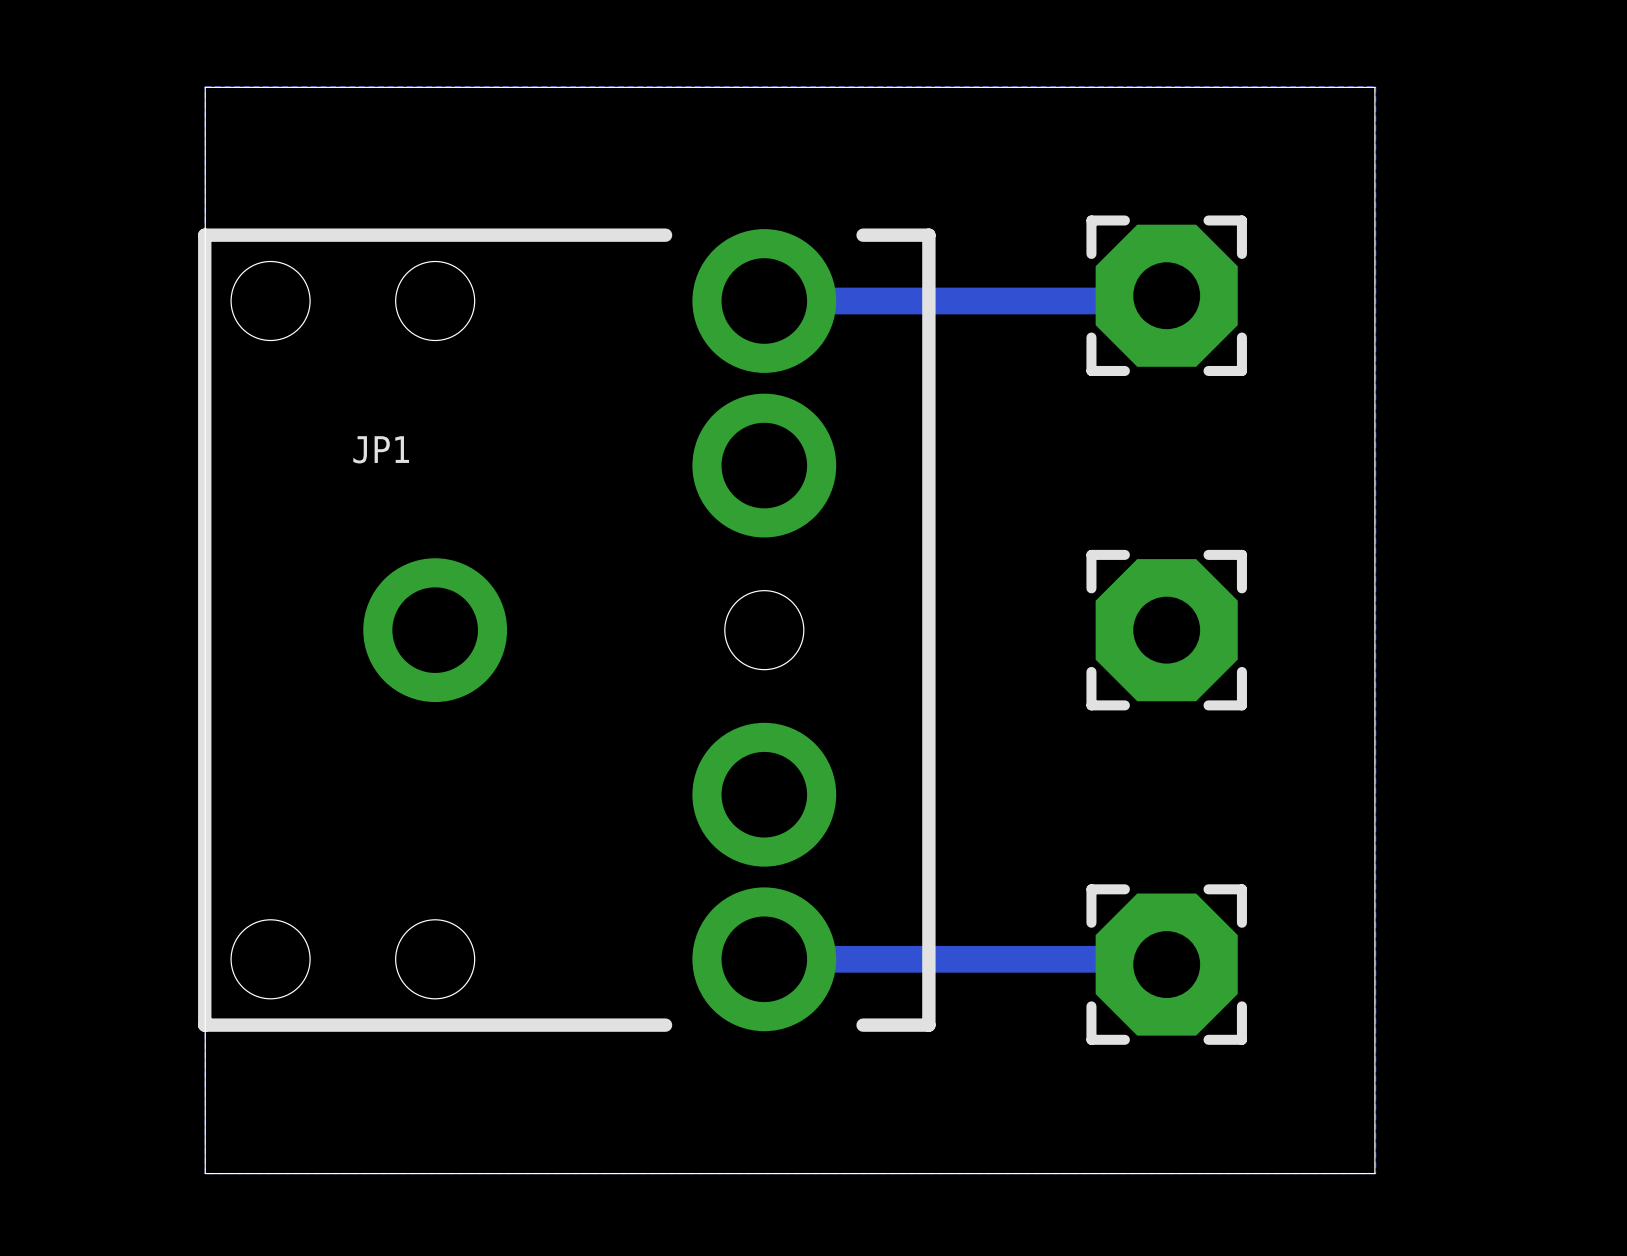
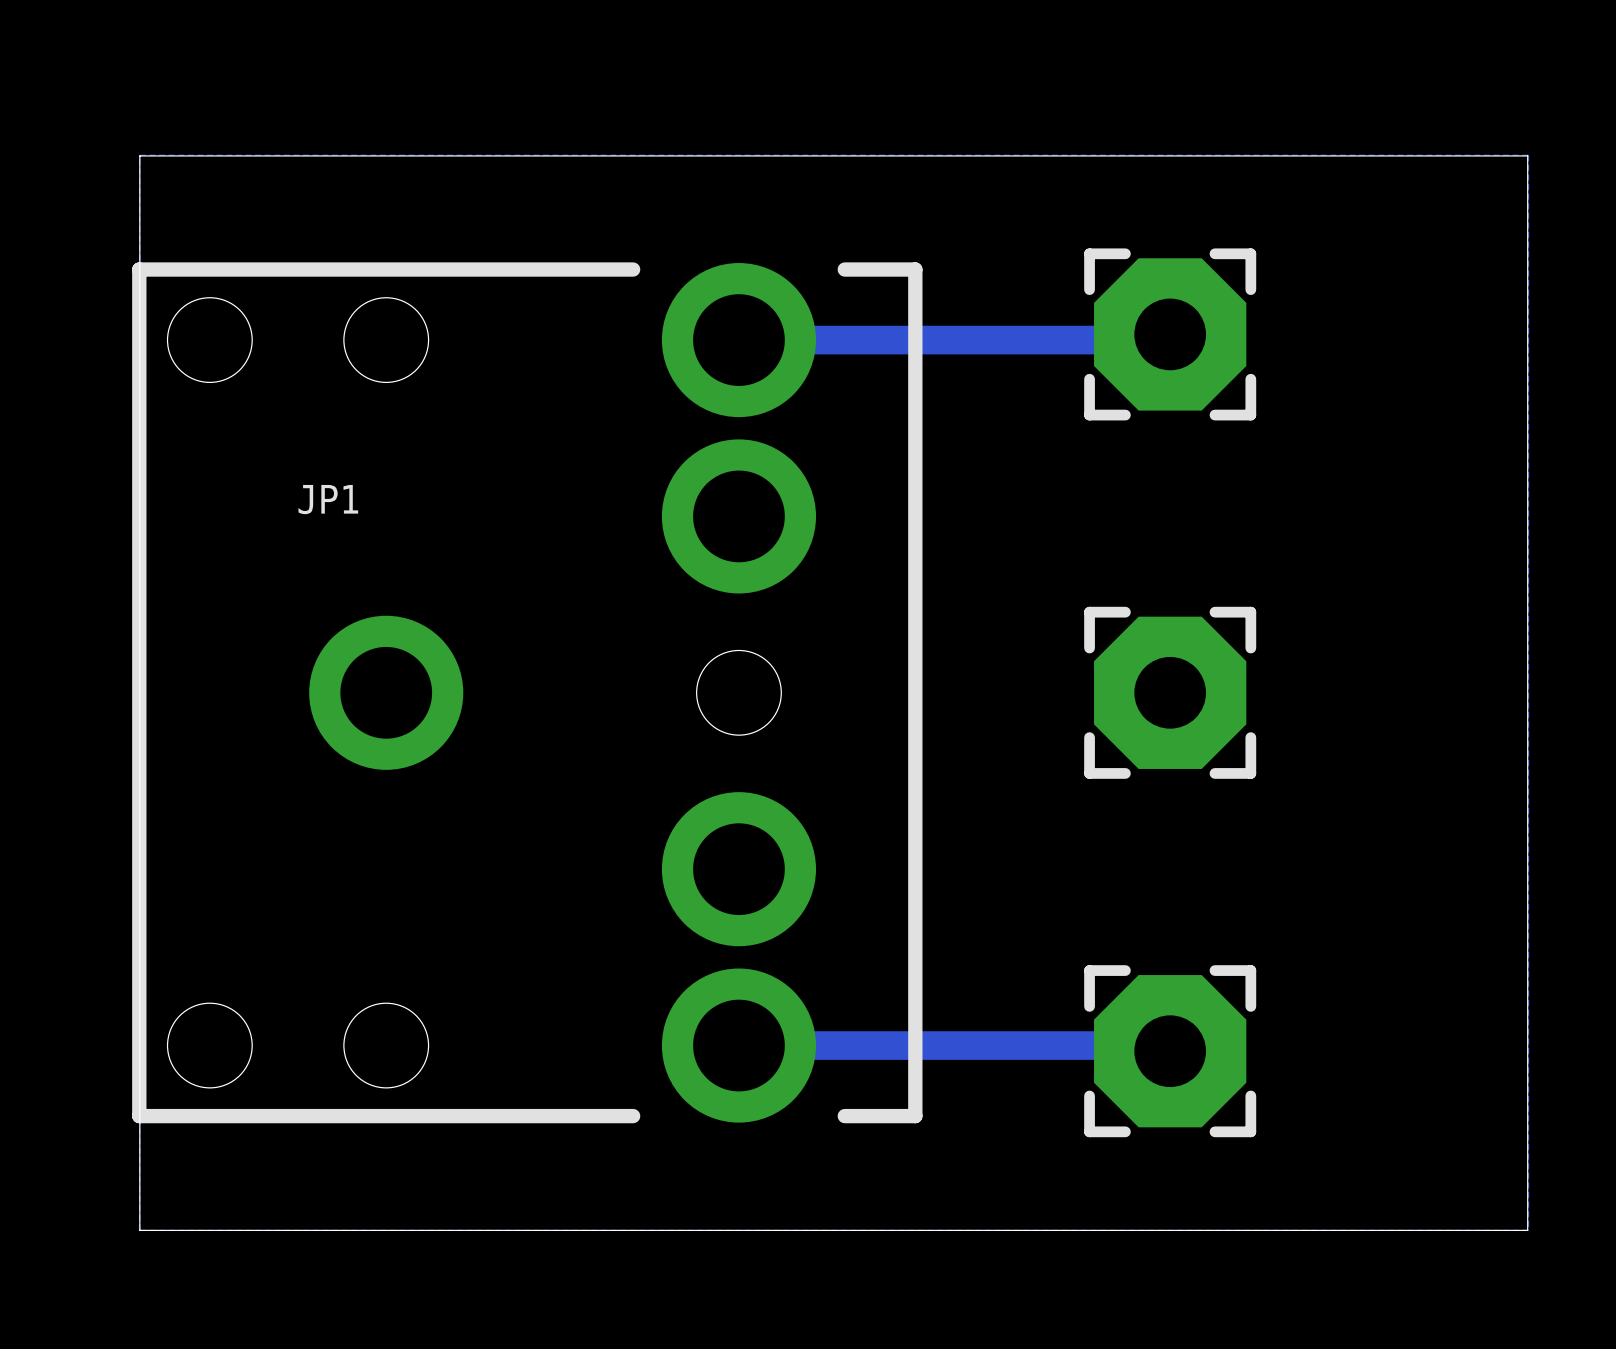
bottom zone outline: (205, 128) (205, 86) (1375, 86) (1375, 1173) (205, 1173) (205, 1131) -> (139, 155) (1528, 155) (1528, 1230) (139, 1230)
board edge: (205, 129) (205, 87) (1374, 87) (1374, 1173) (205, 1173) (205, 1131) -> (139, 155) (1527, 155) (1527, 1230) (139, 1230)

